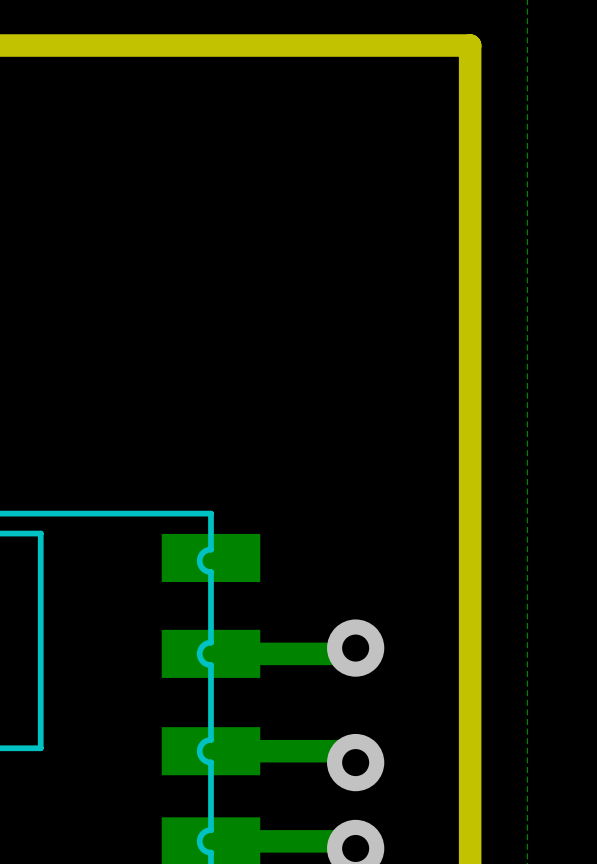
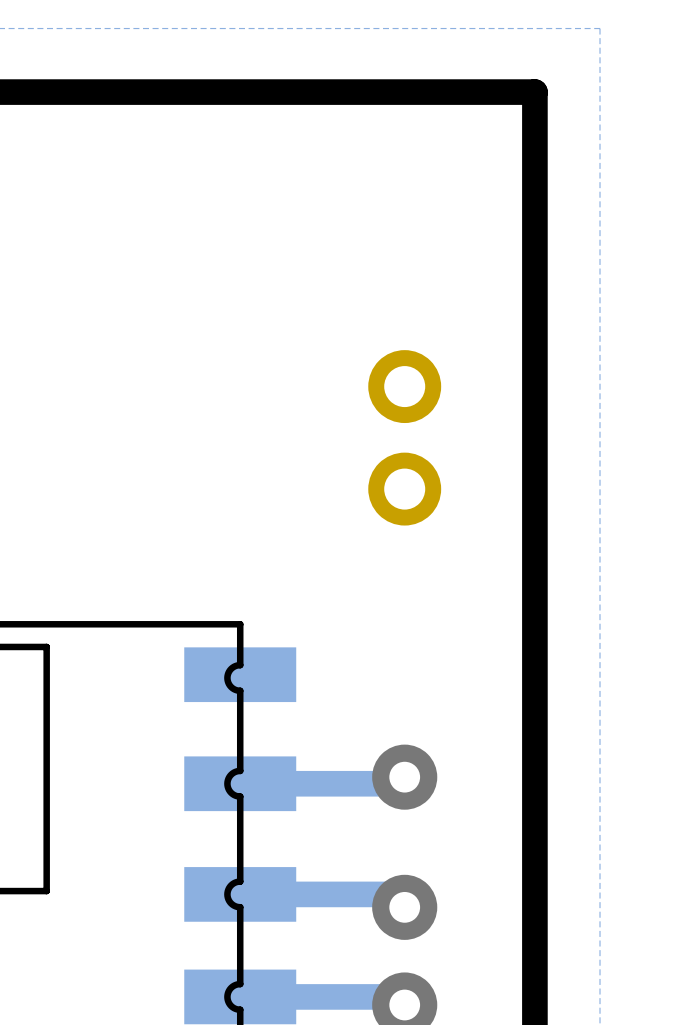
part: none -> (404, 437)

